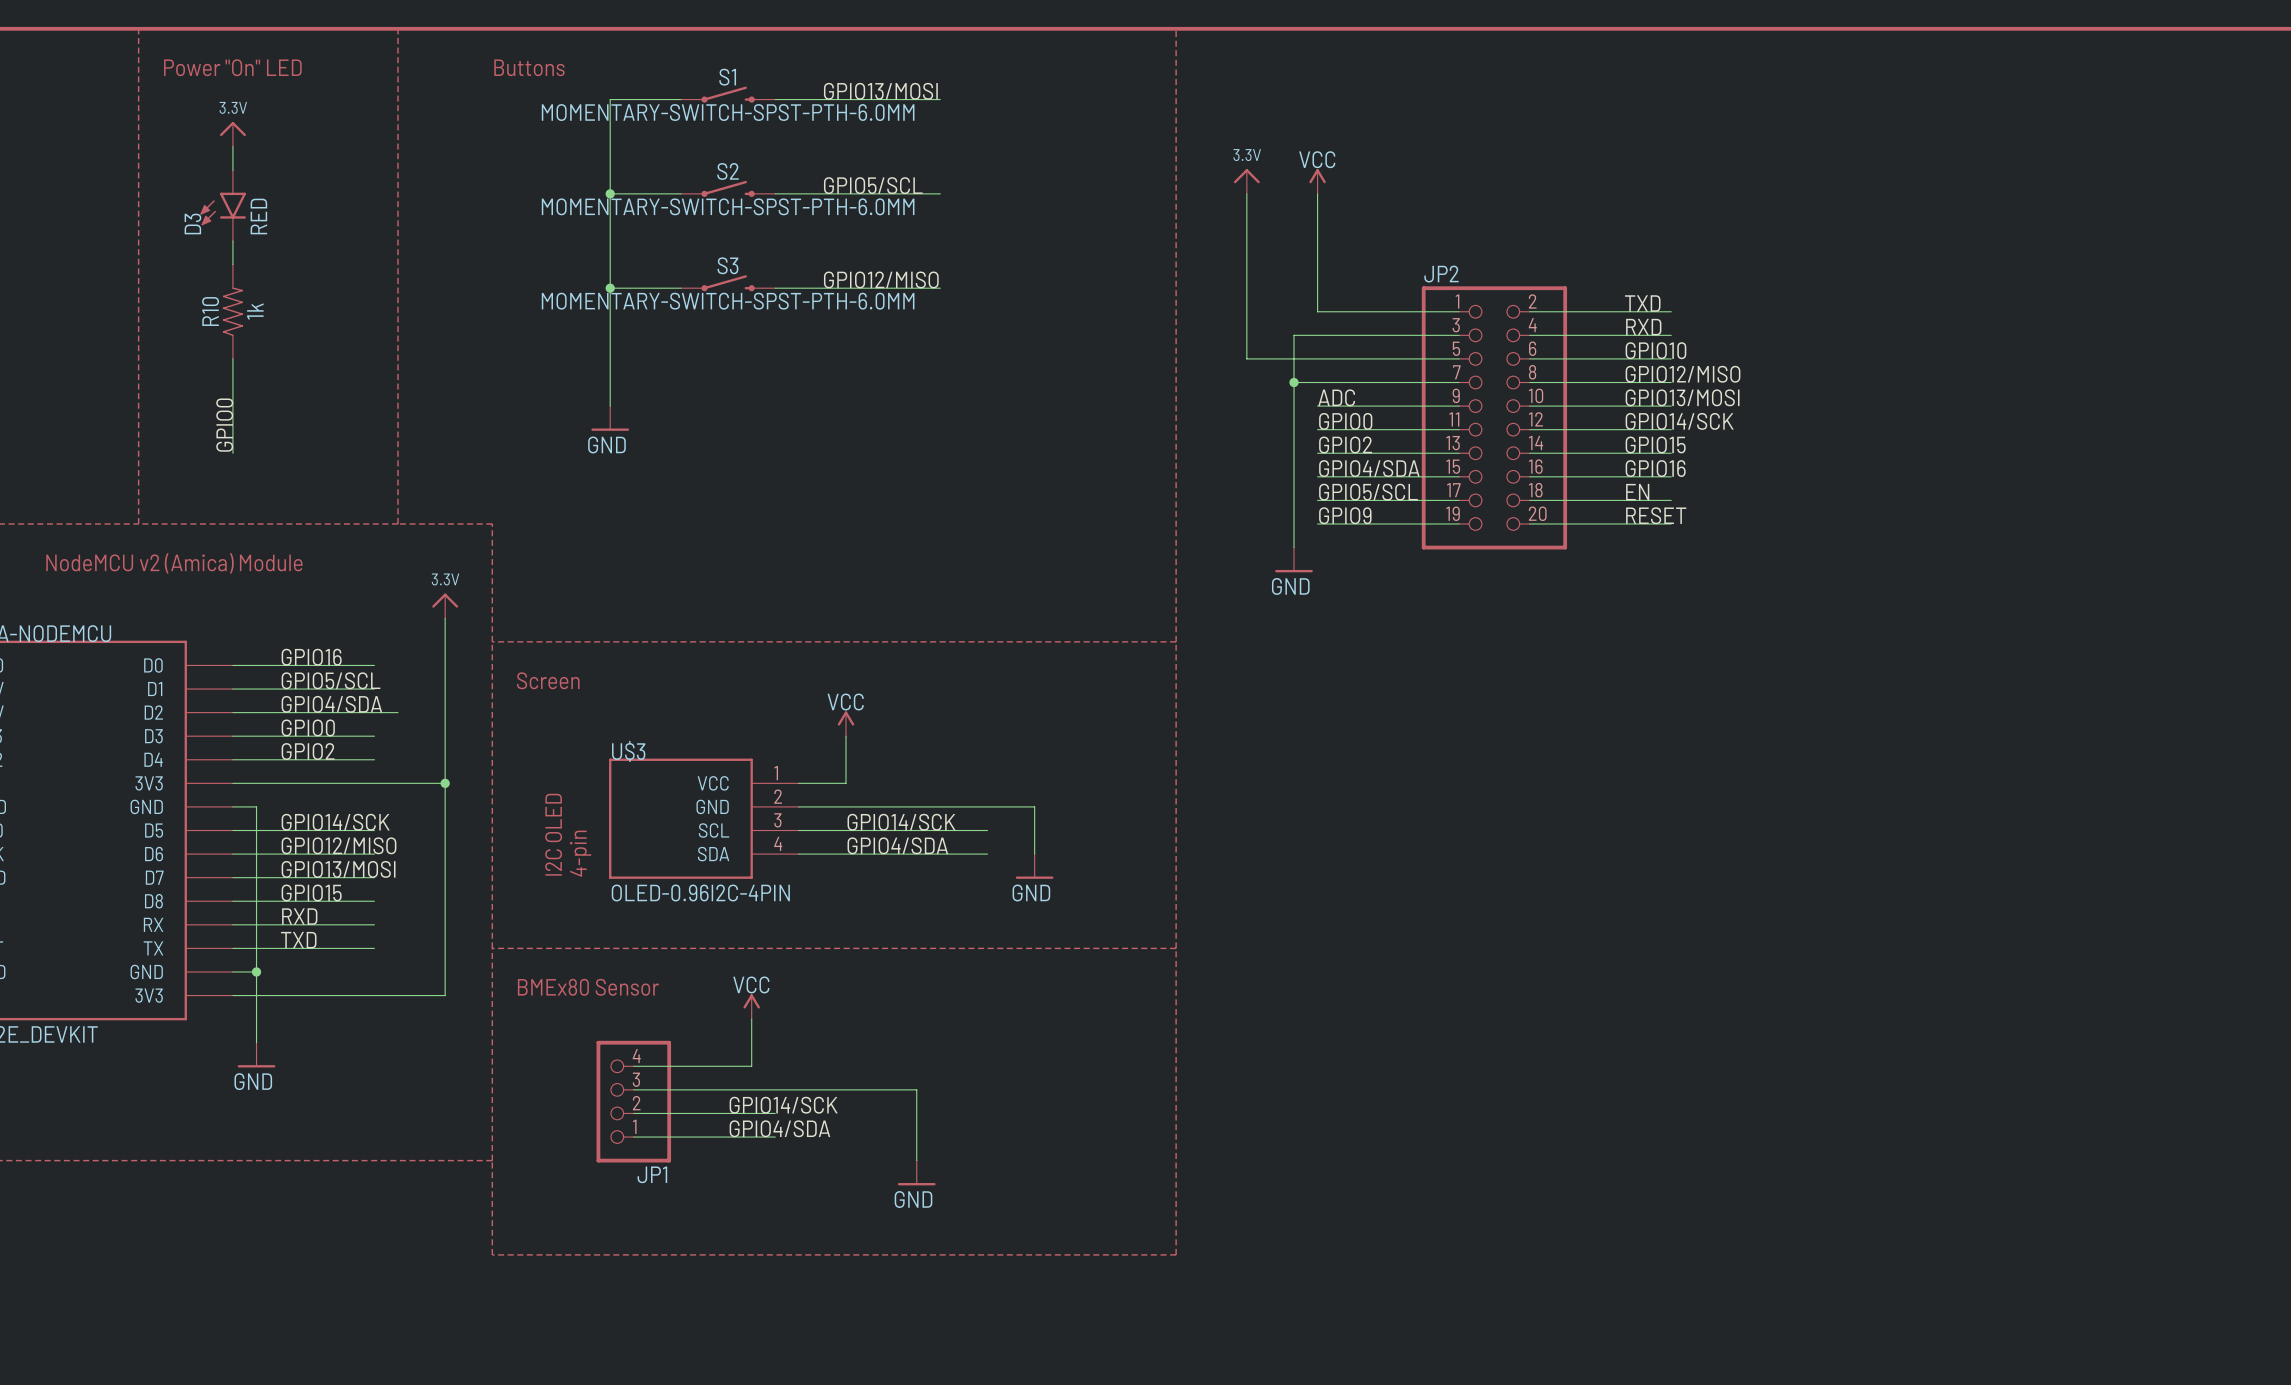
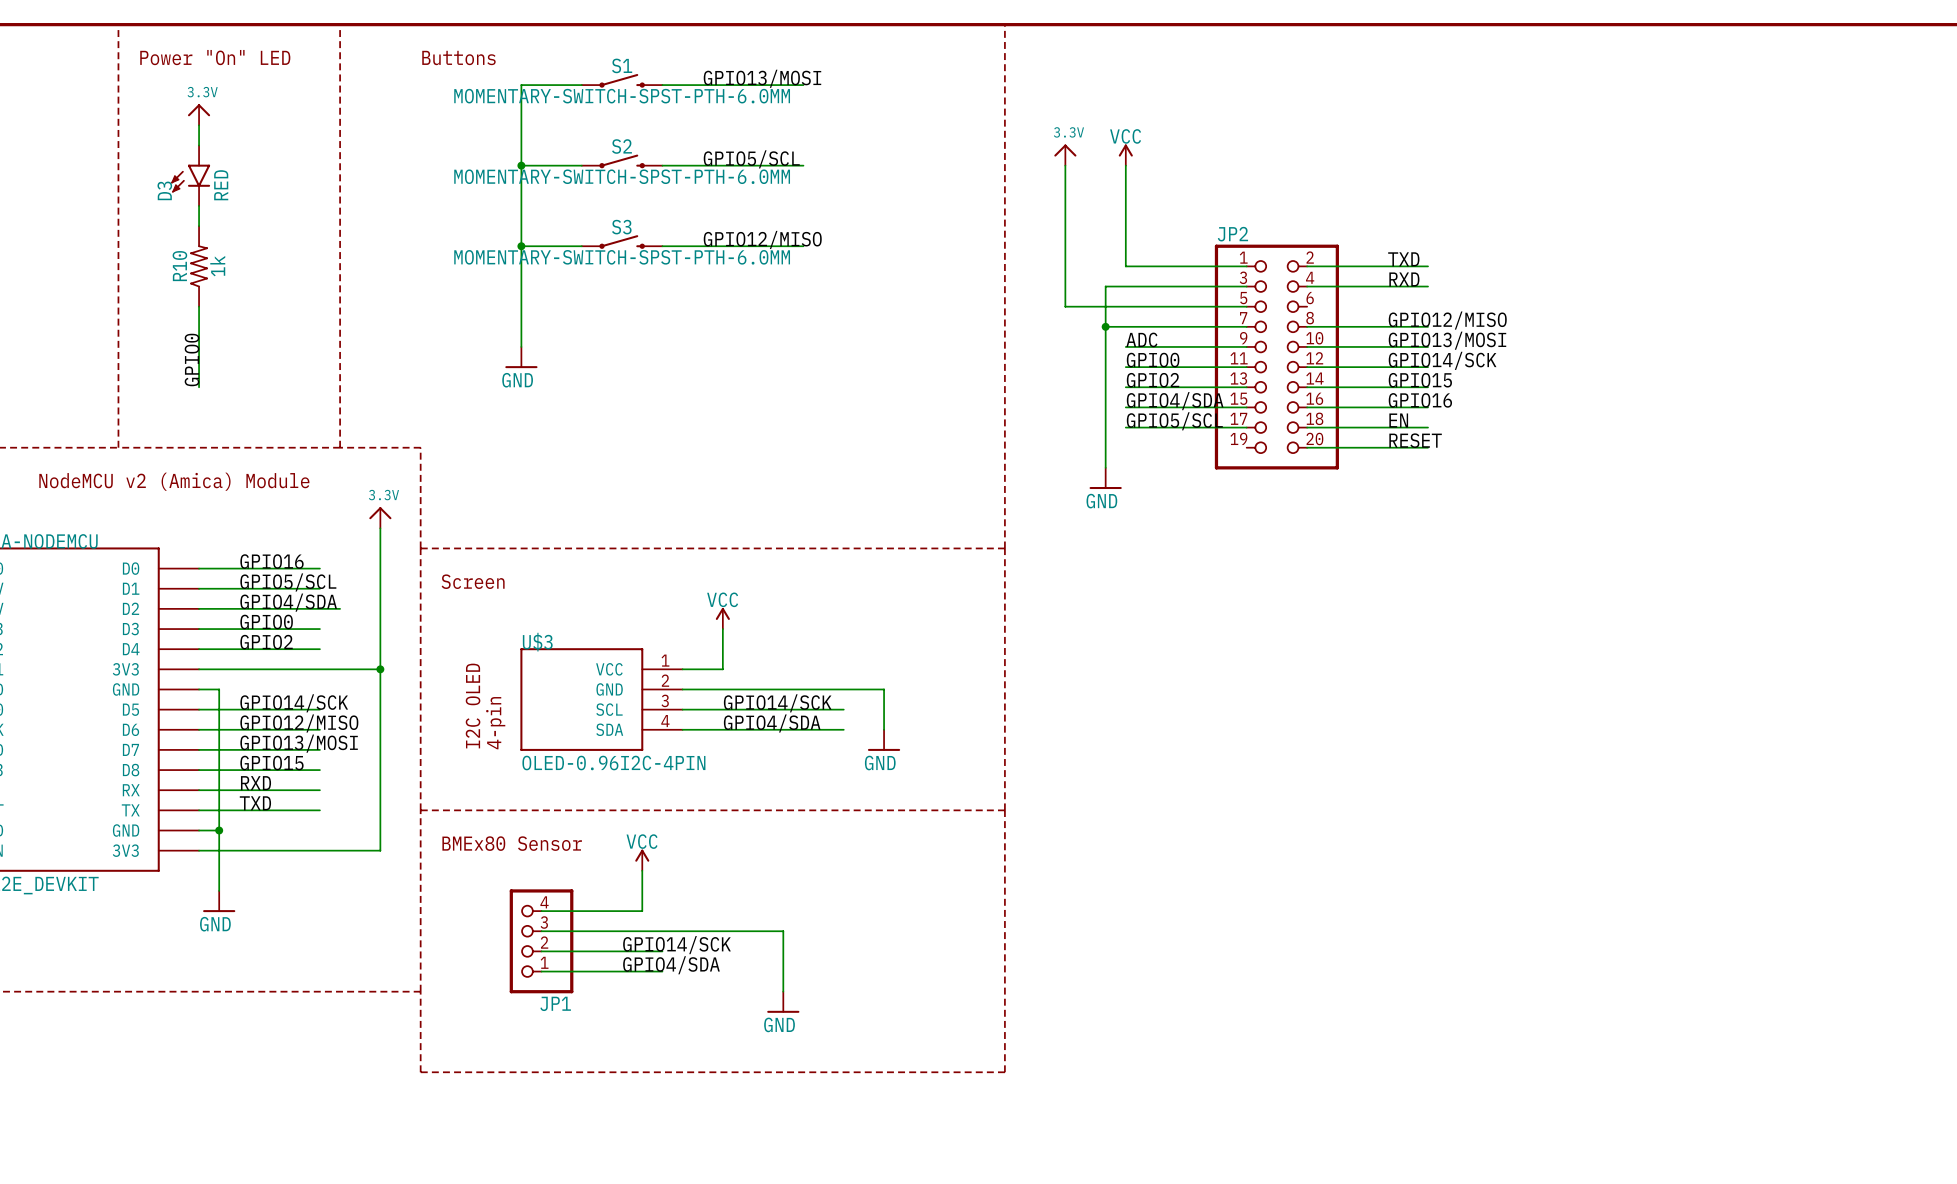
label: GPIO10 (1655, 350) -> none
wire: (1529, 358) (1671, 358) -> none
label: GPIO9 (1345, 515) -> none
wire: (1317, 523) (1459, 523) -> none

